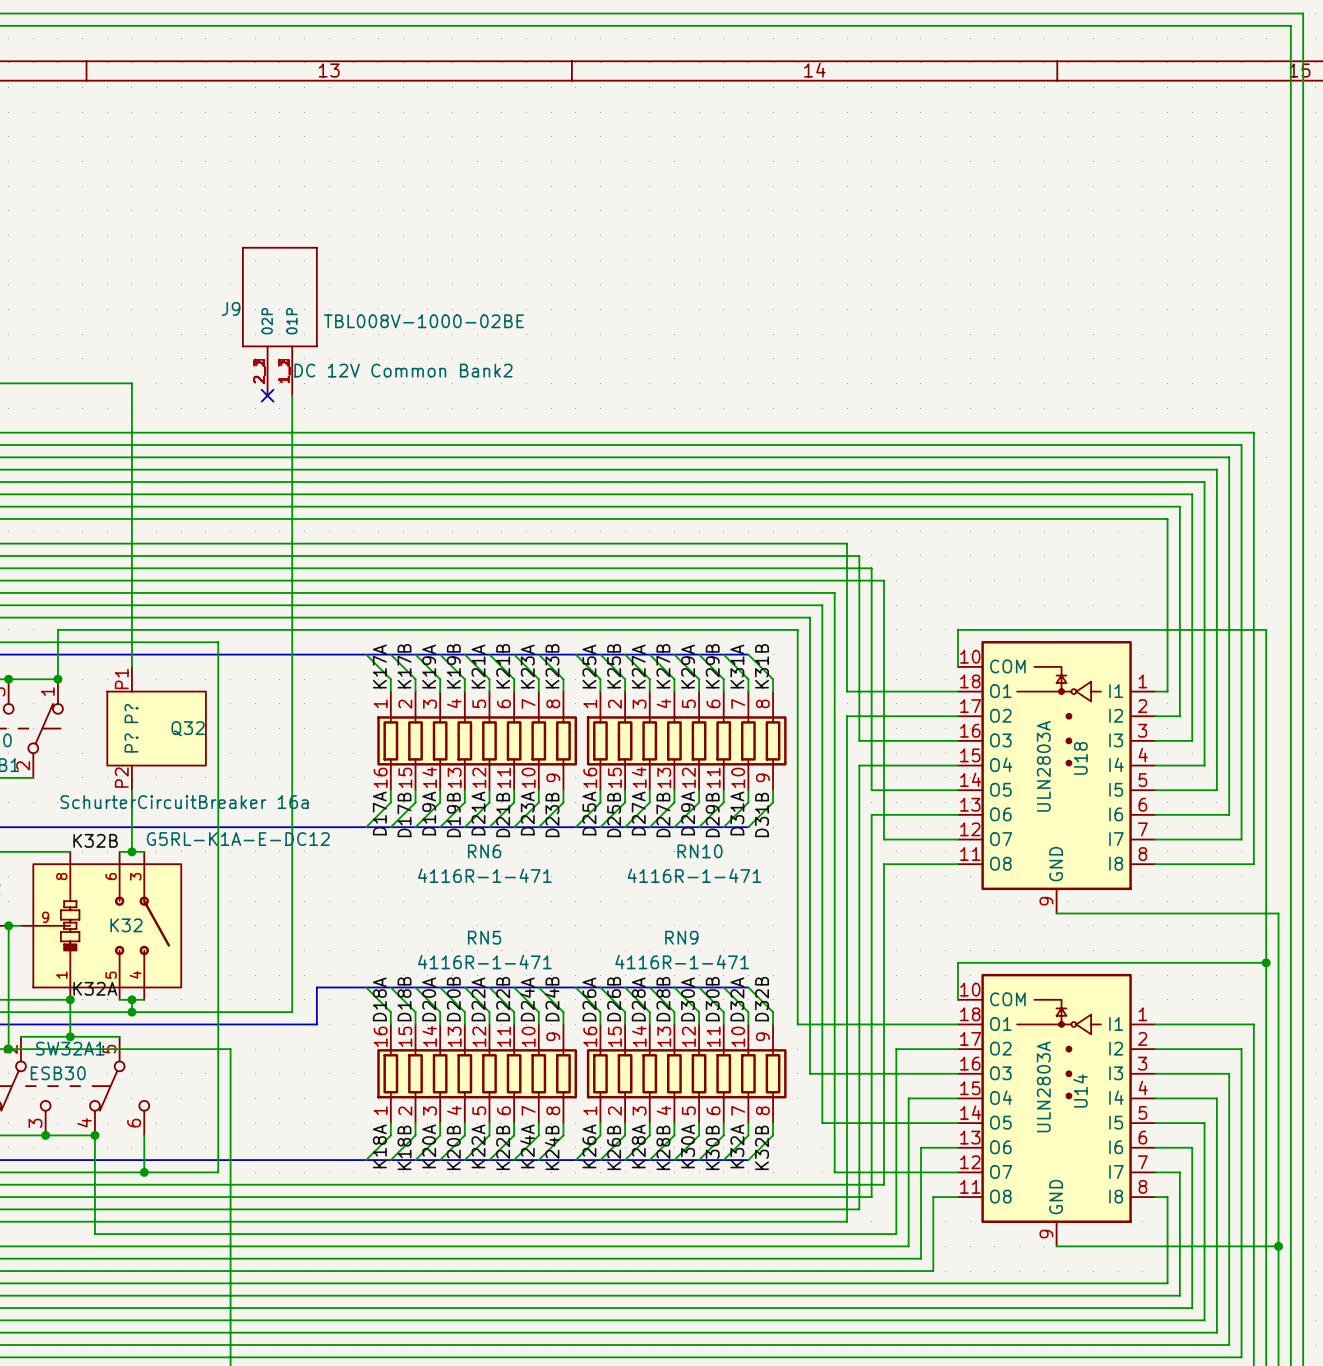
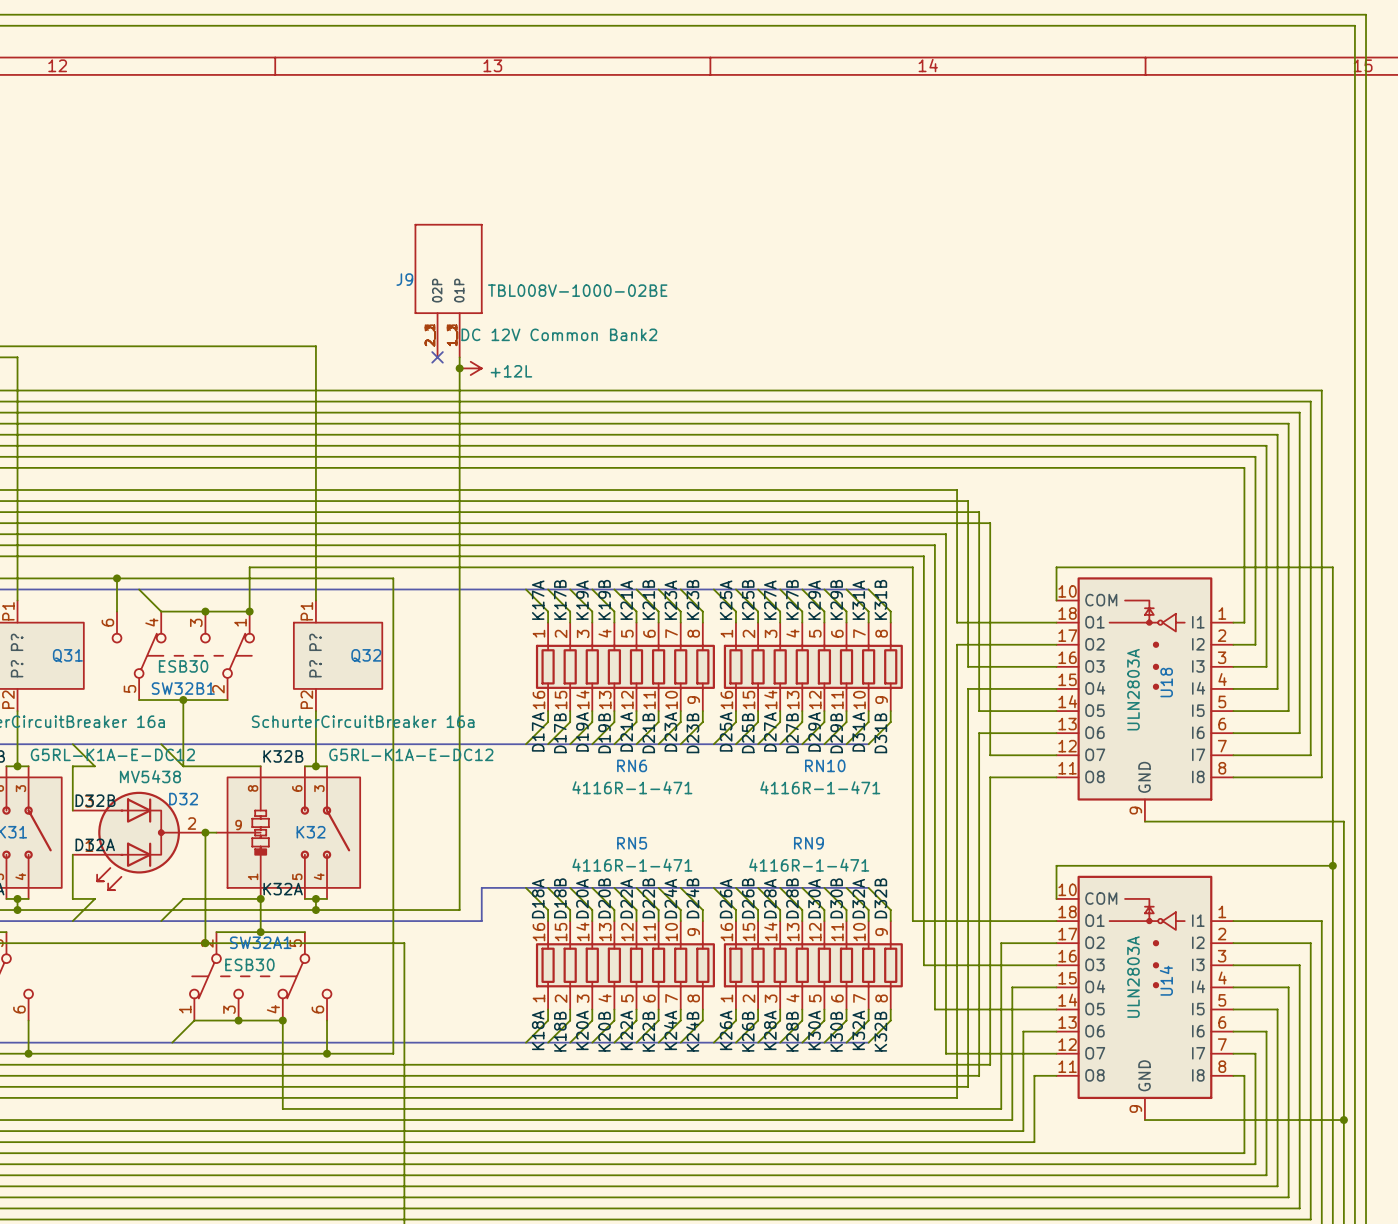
junction: none -> (459, 368)
power symbol: none -> +12L (470, 368)

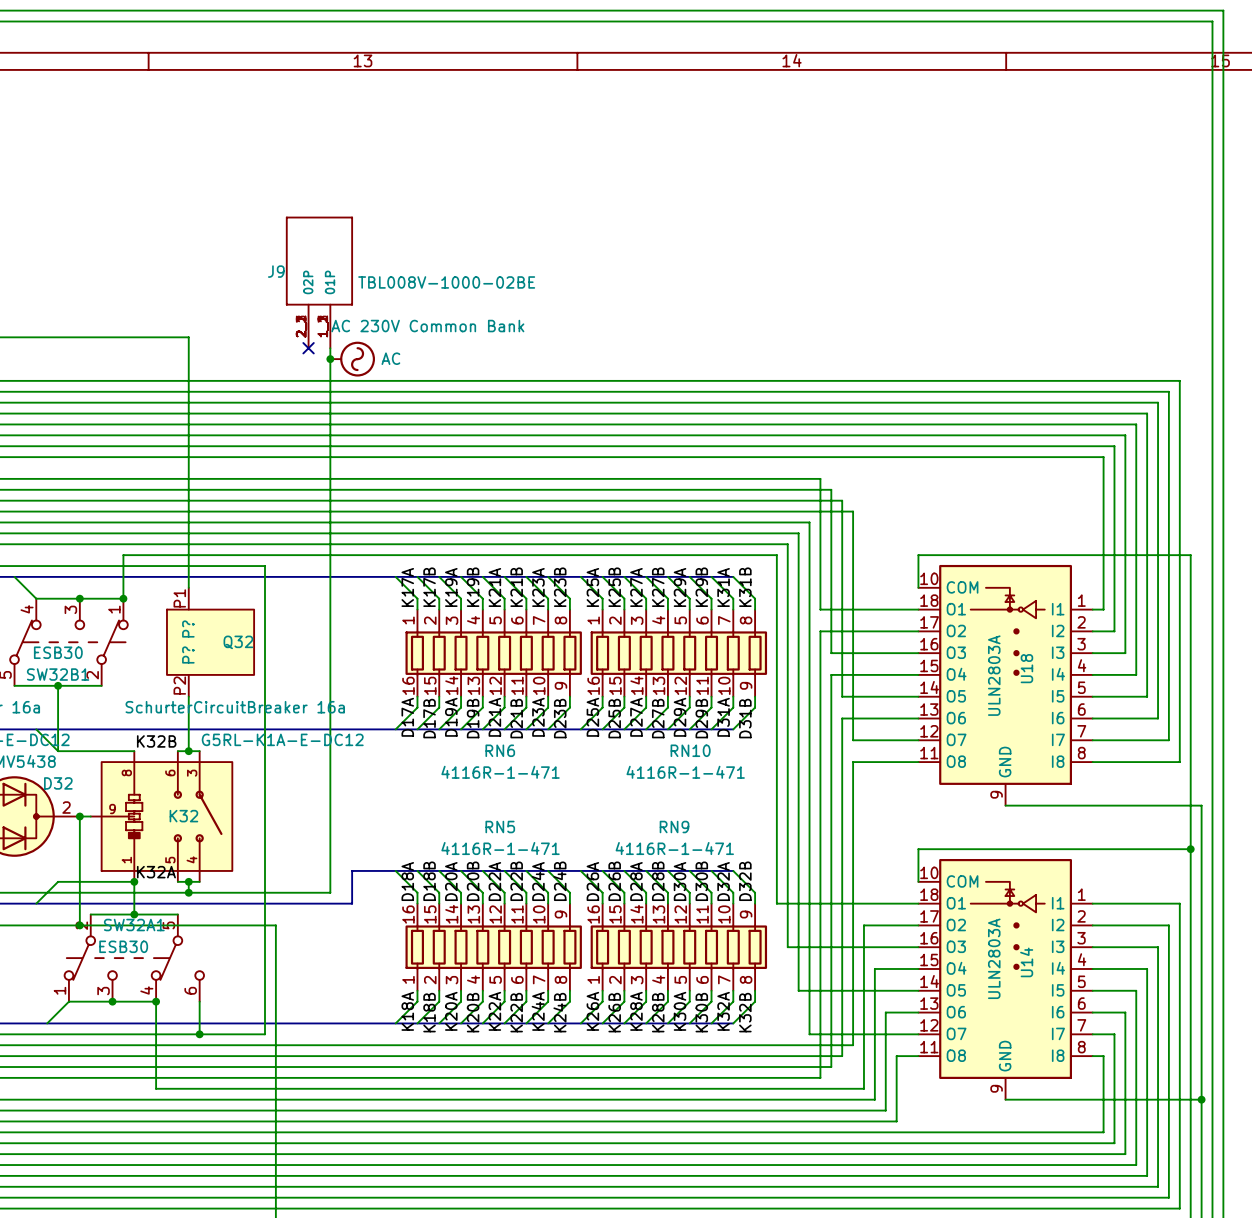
J9 text: DC 12V Common Bank2 (559, 334) -> AC 230V Common Bank (427, 326)
power symbol: +12L (470, 368) -> none
power symbol: none -> AC (352, 359)

